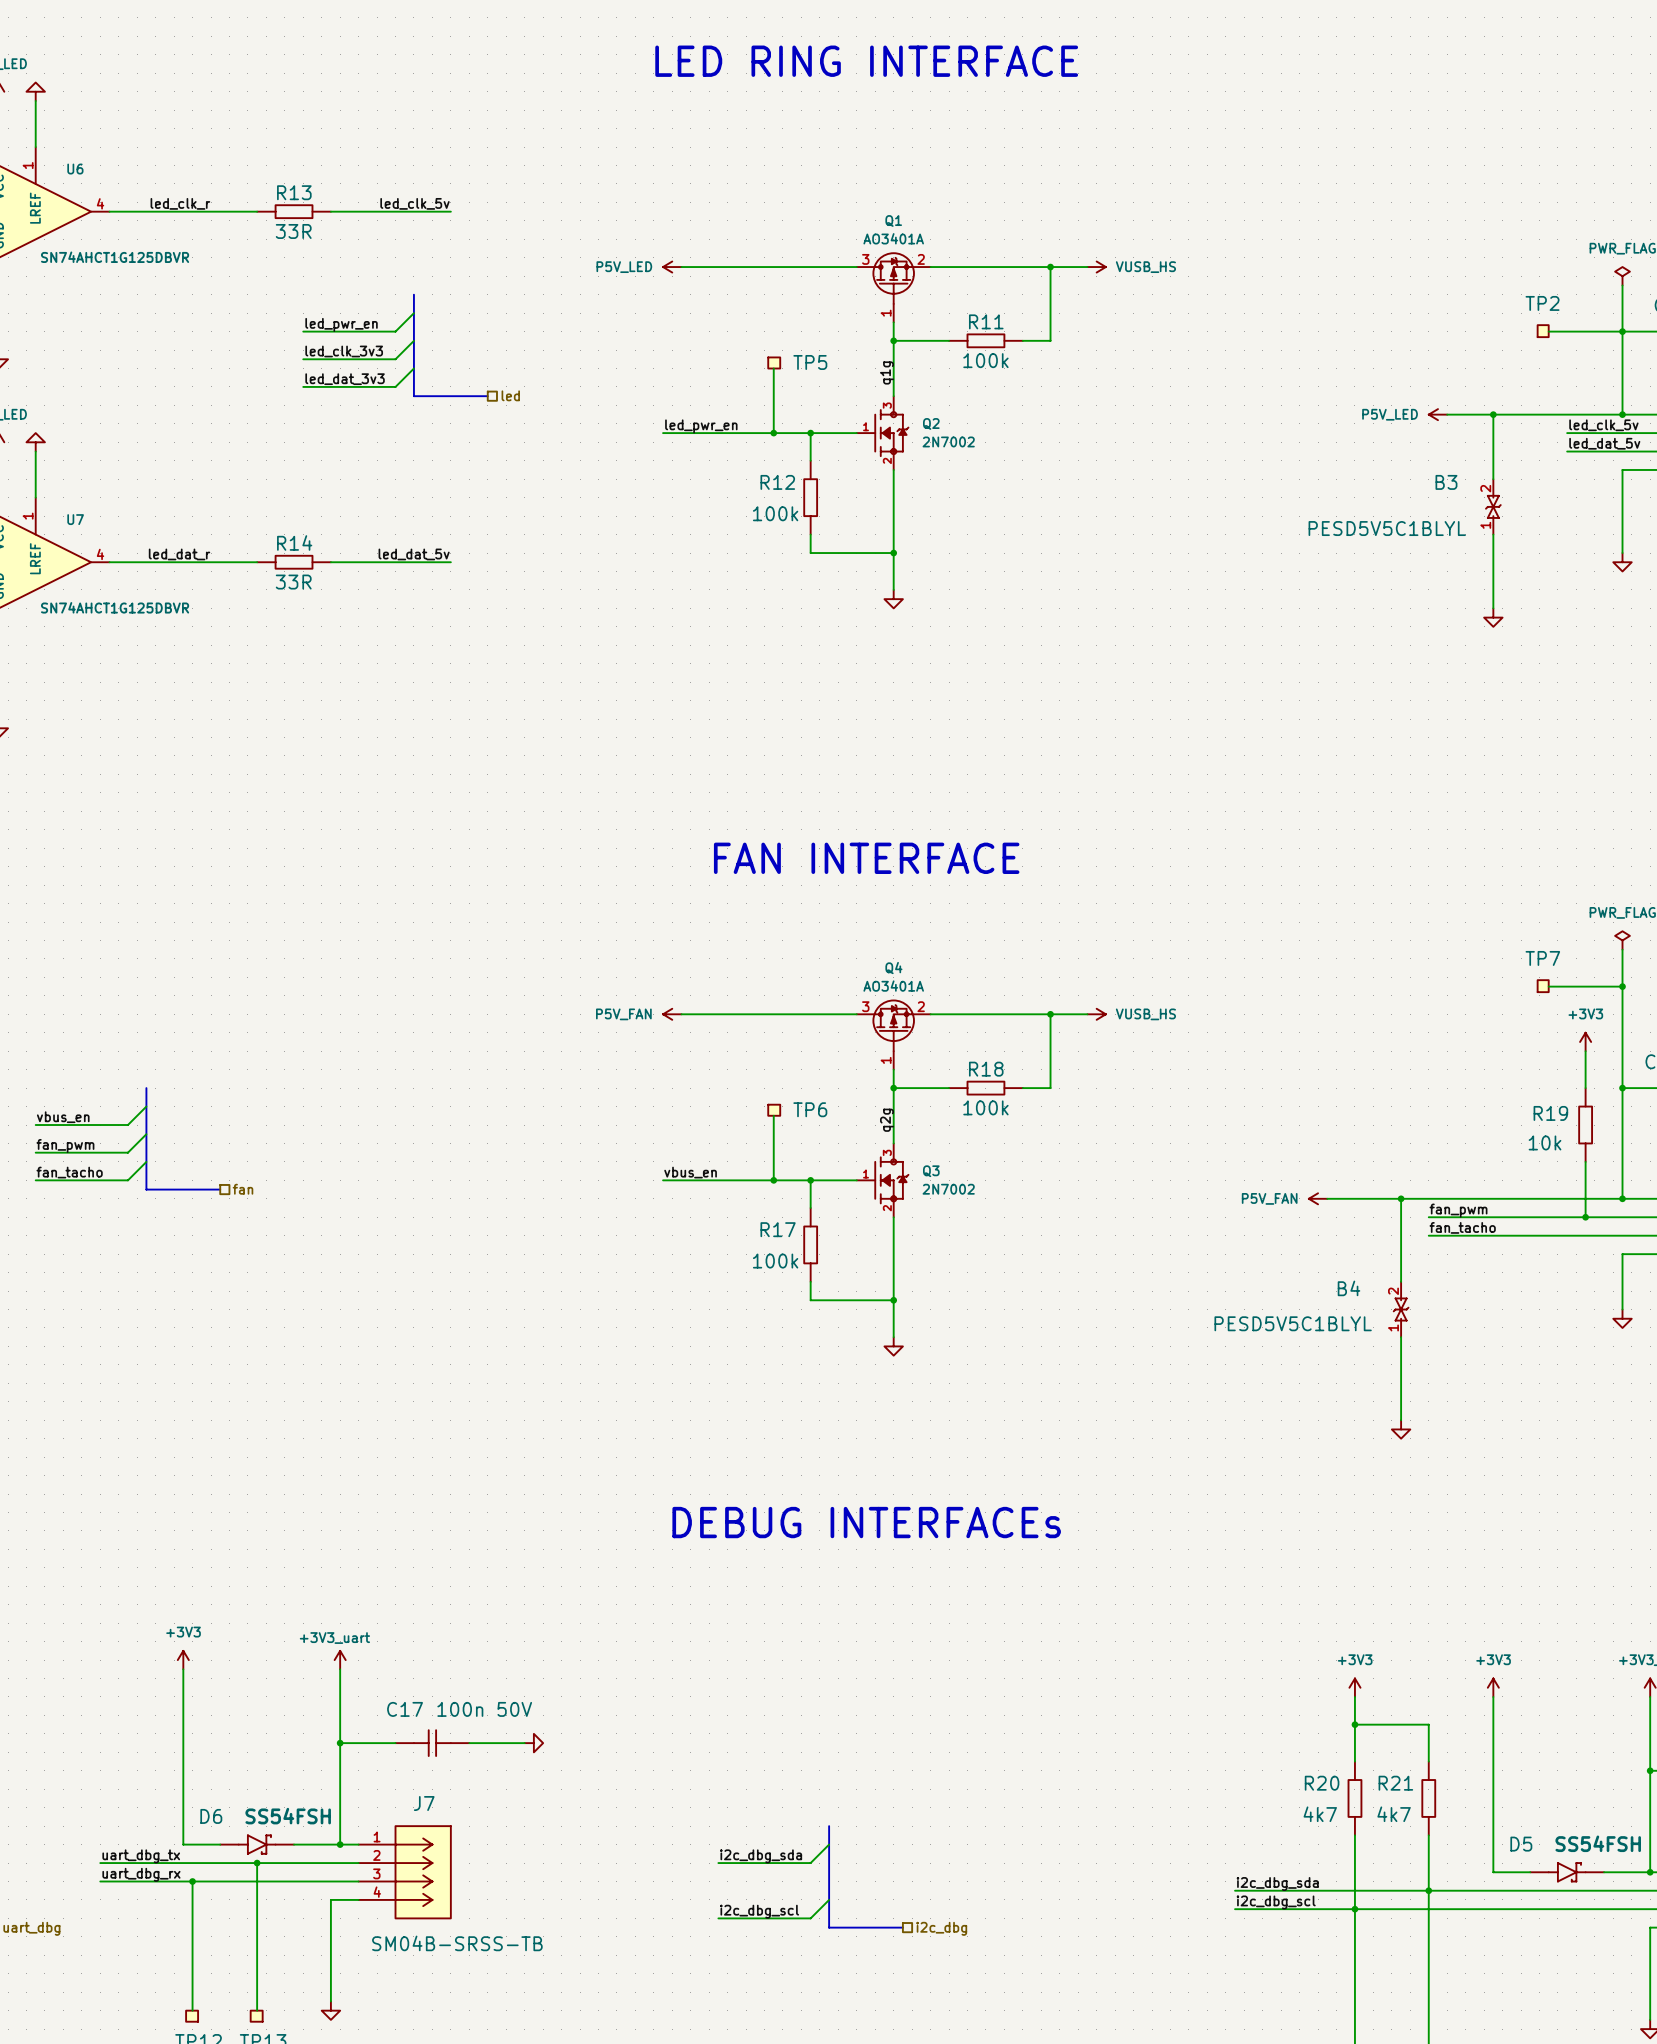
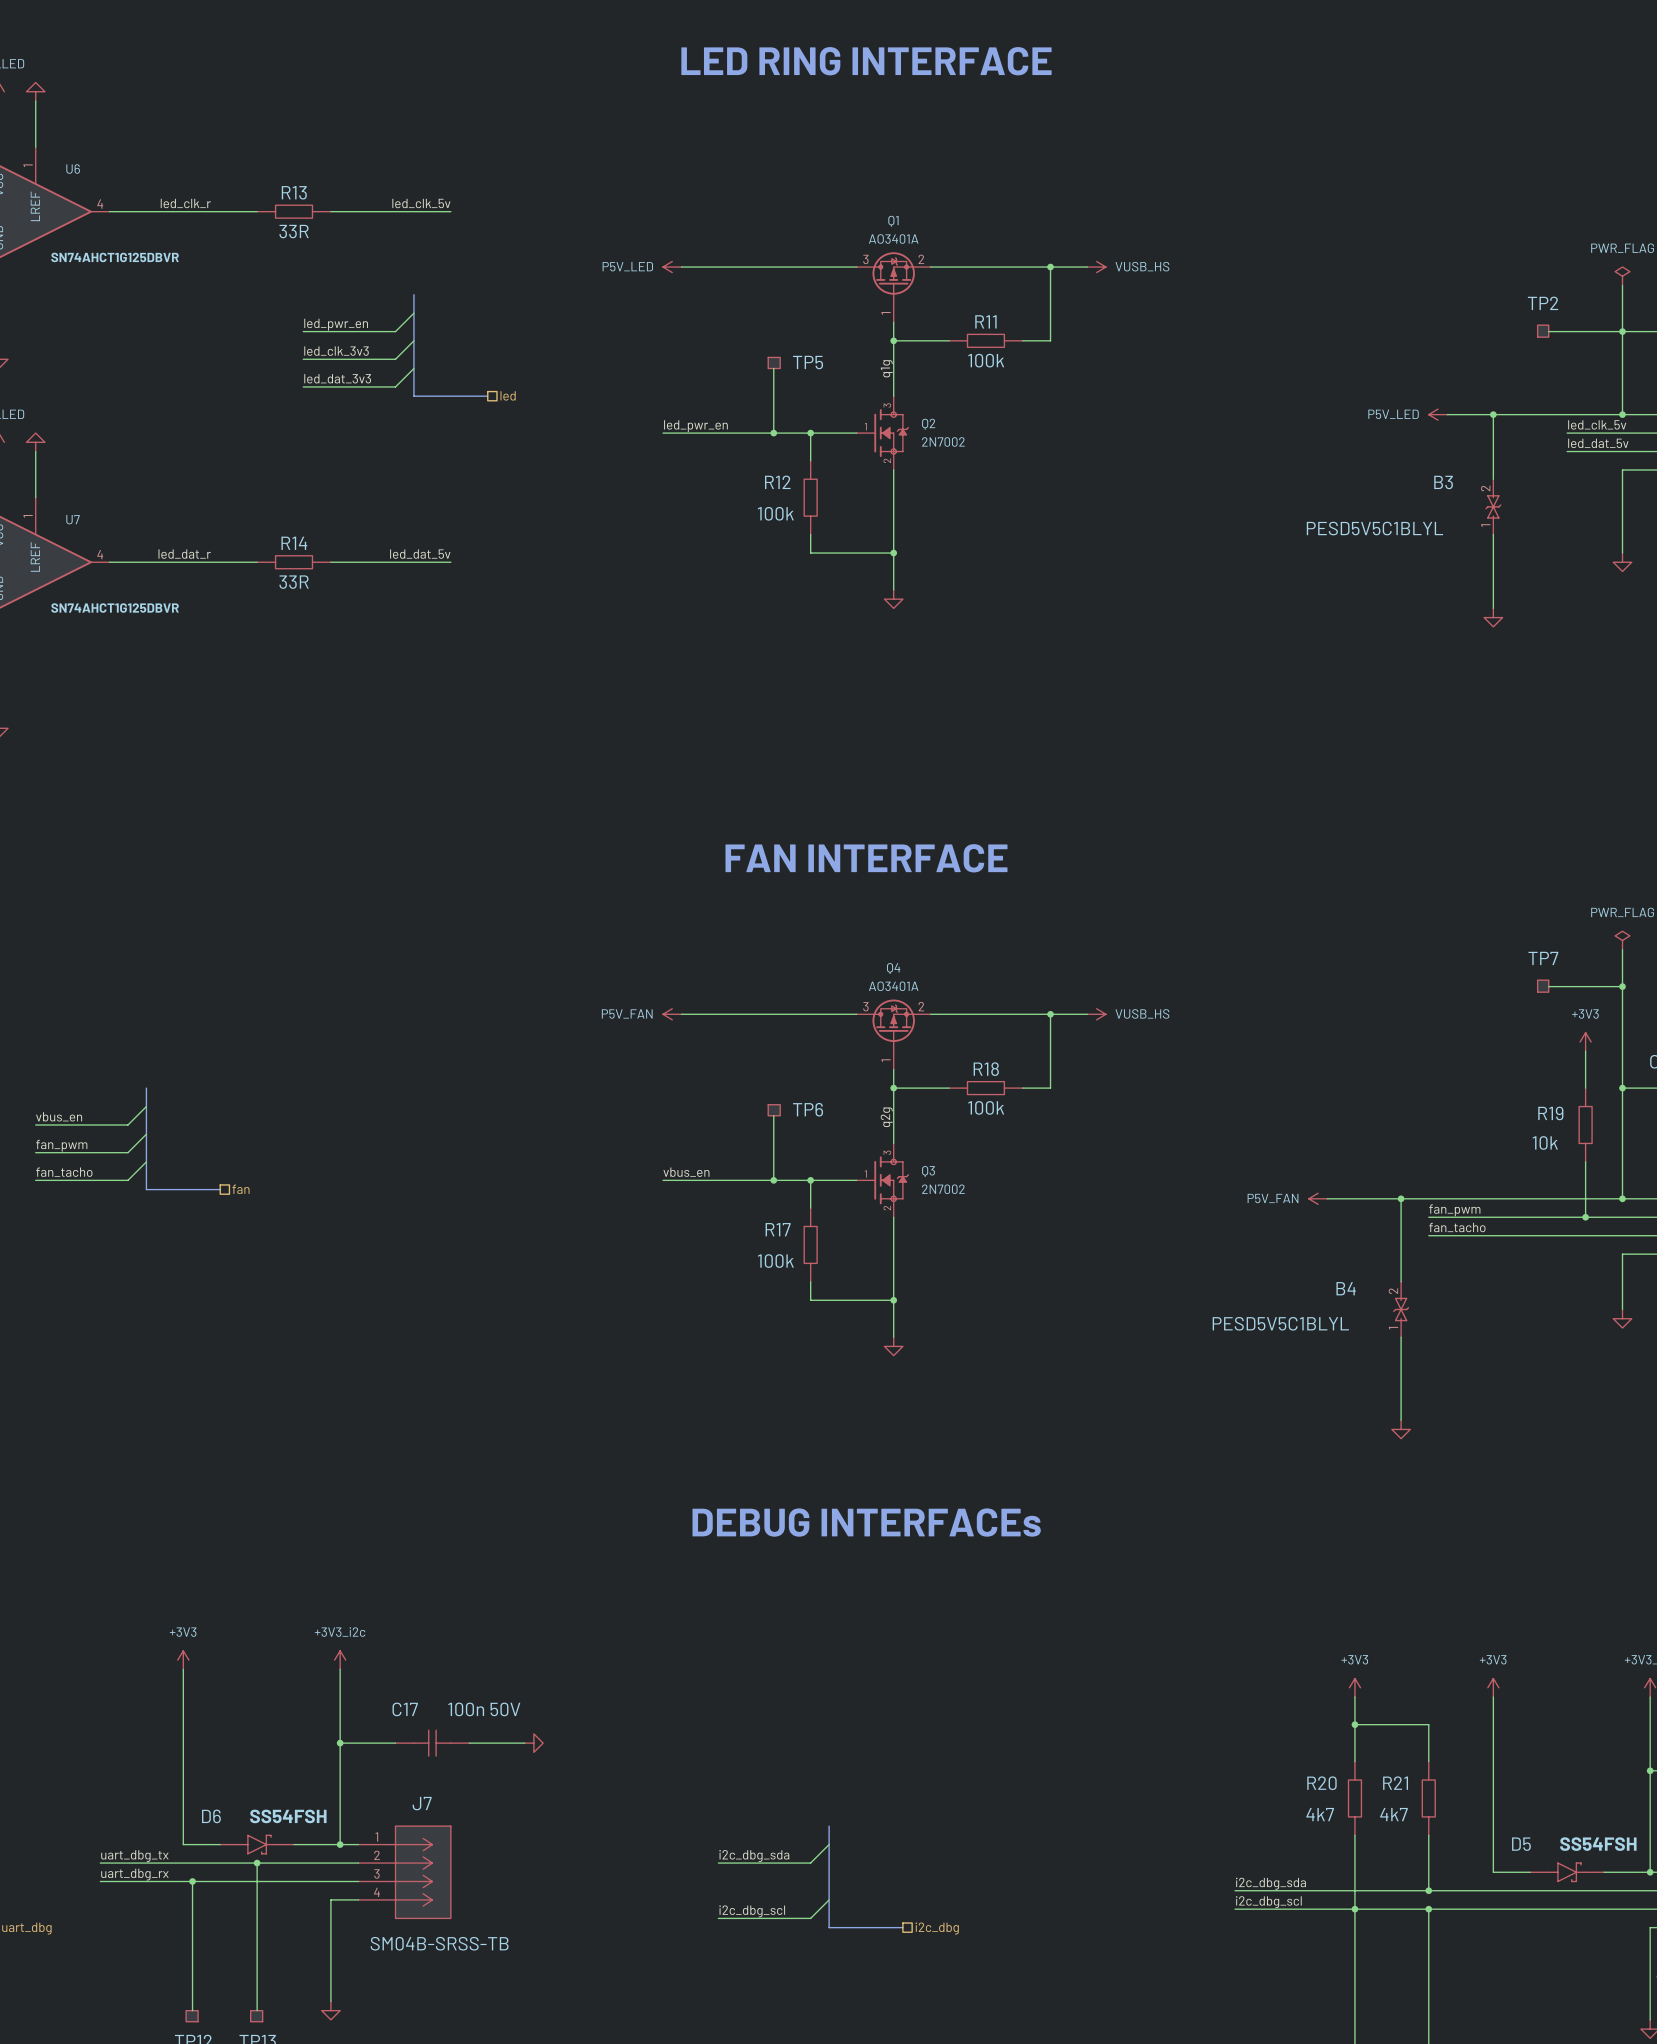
power symbol: +3V3_uart (340, 1660) -> +3V3_i2c (340, 1660)
wire: (1428, 1890) (1428, 1909) -> none
junction: none -> (1428, 1909)

